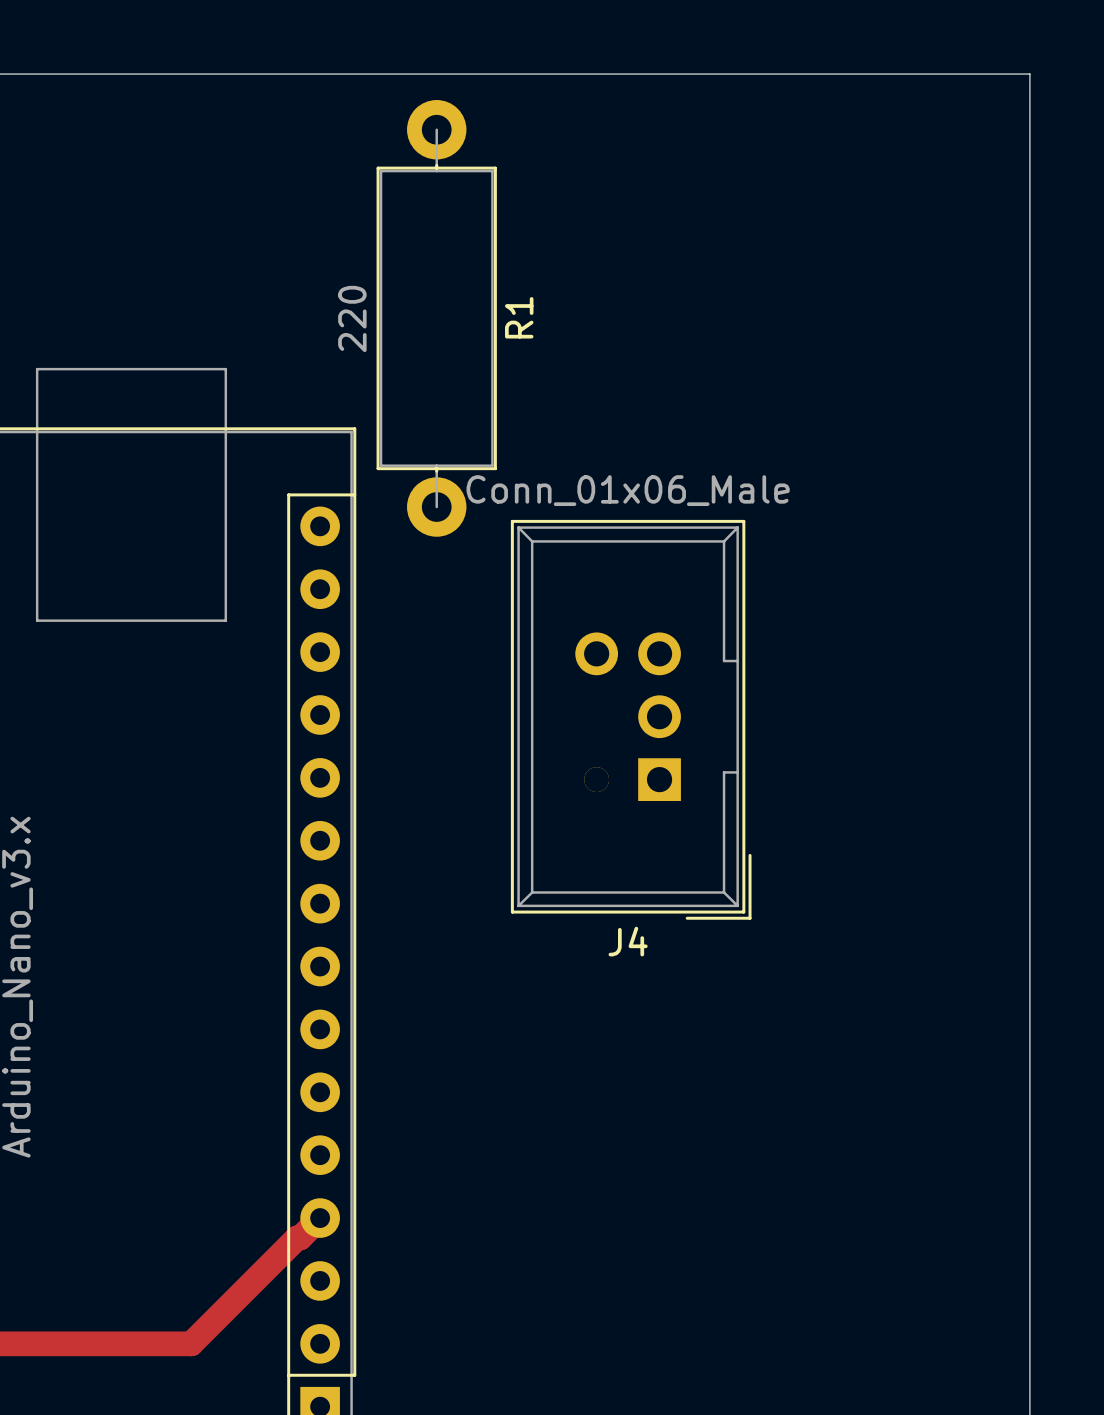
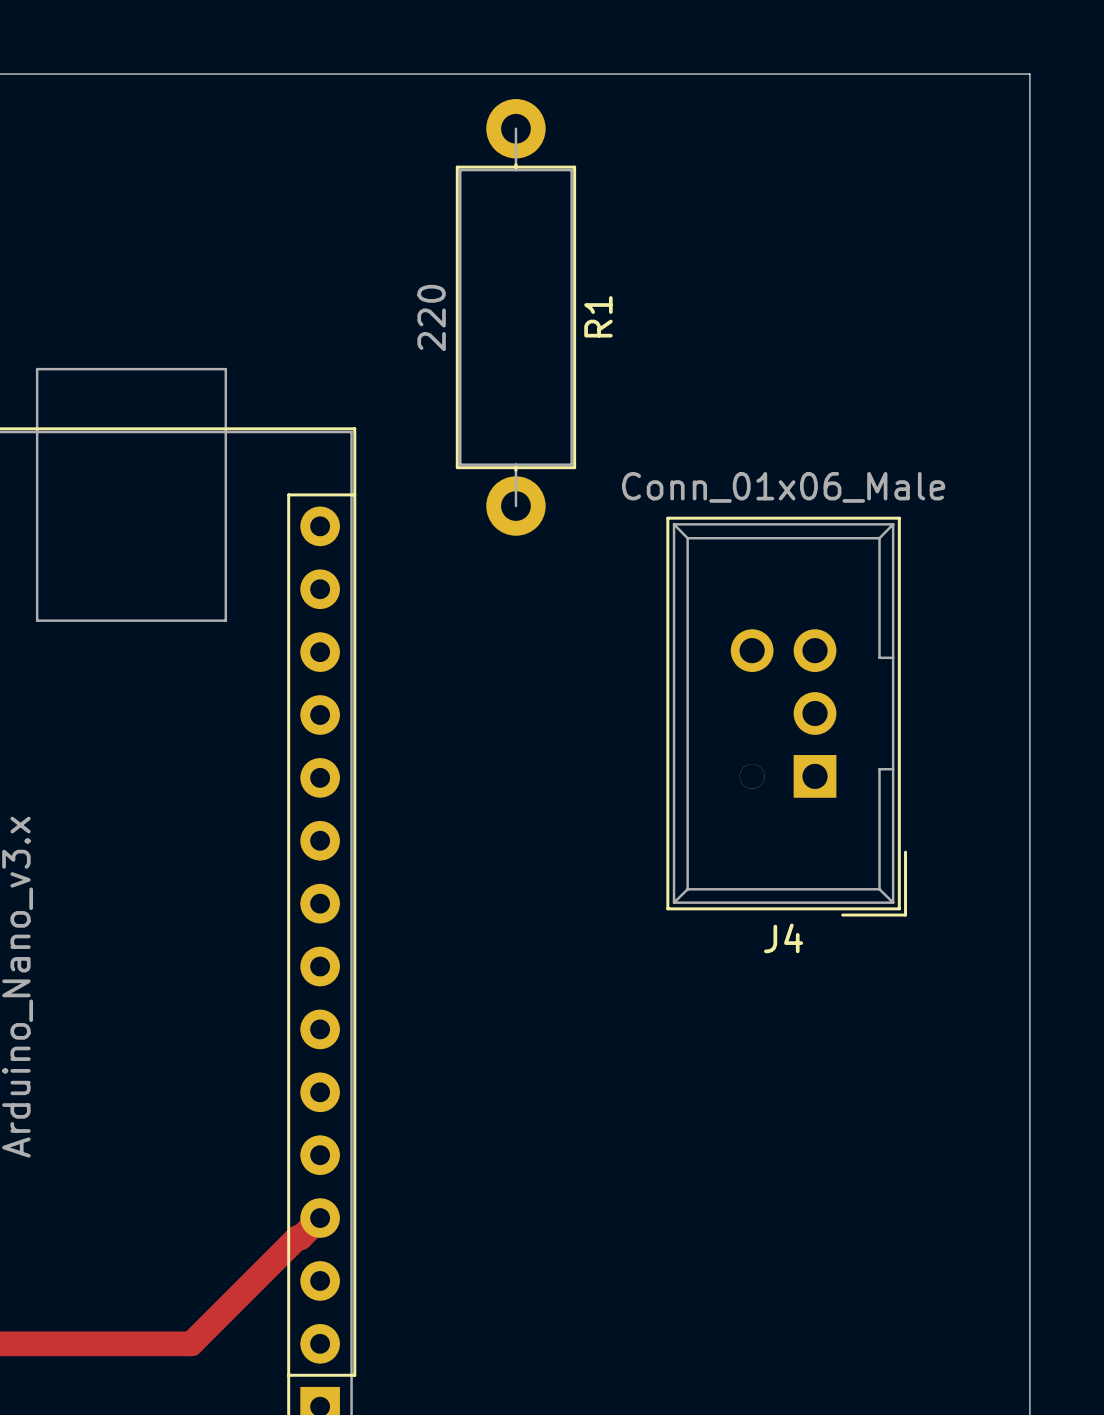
R1 position: (436, 318) -> (515, 317)
J4 position: (631, 719) -> (786, 716)

